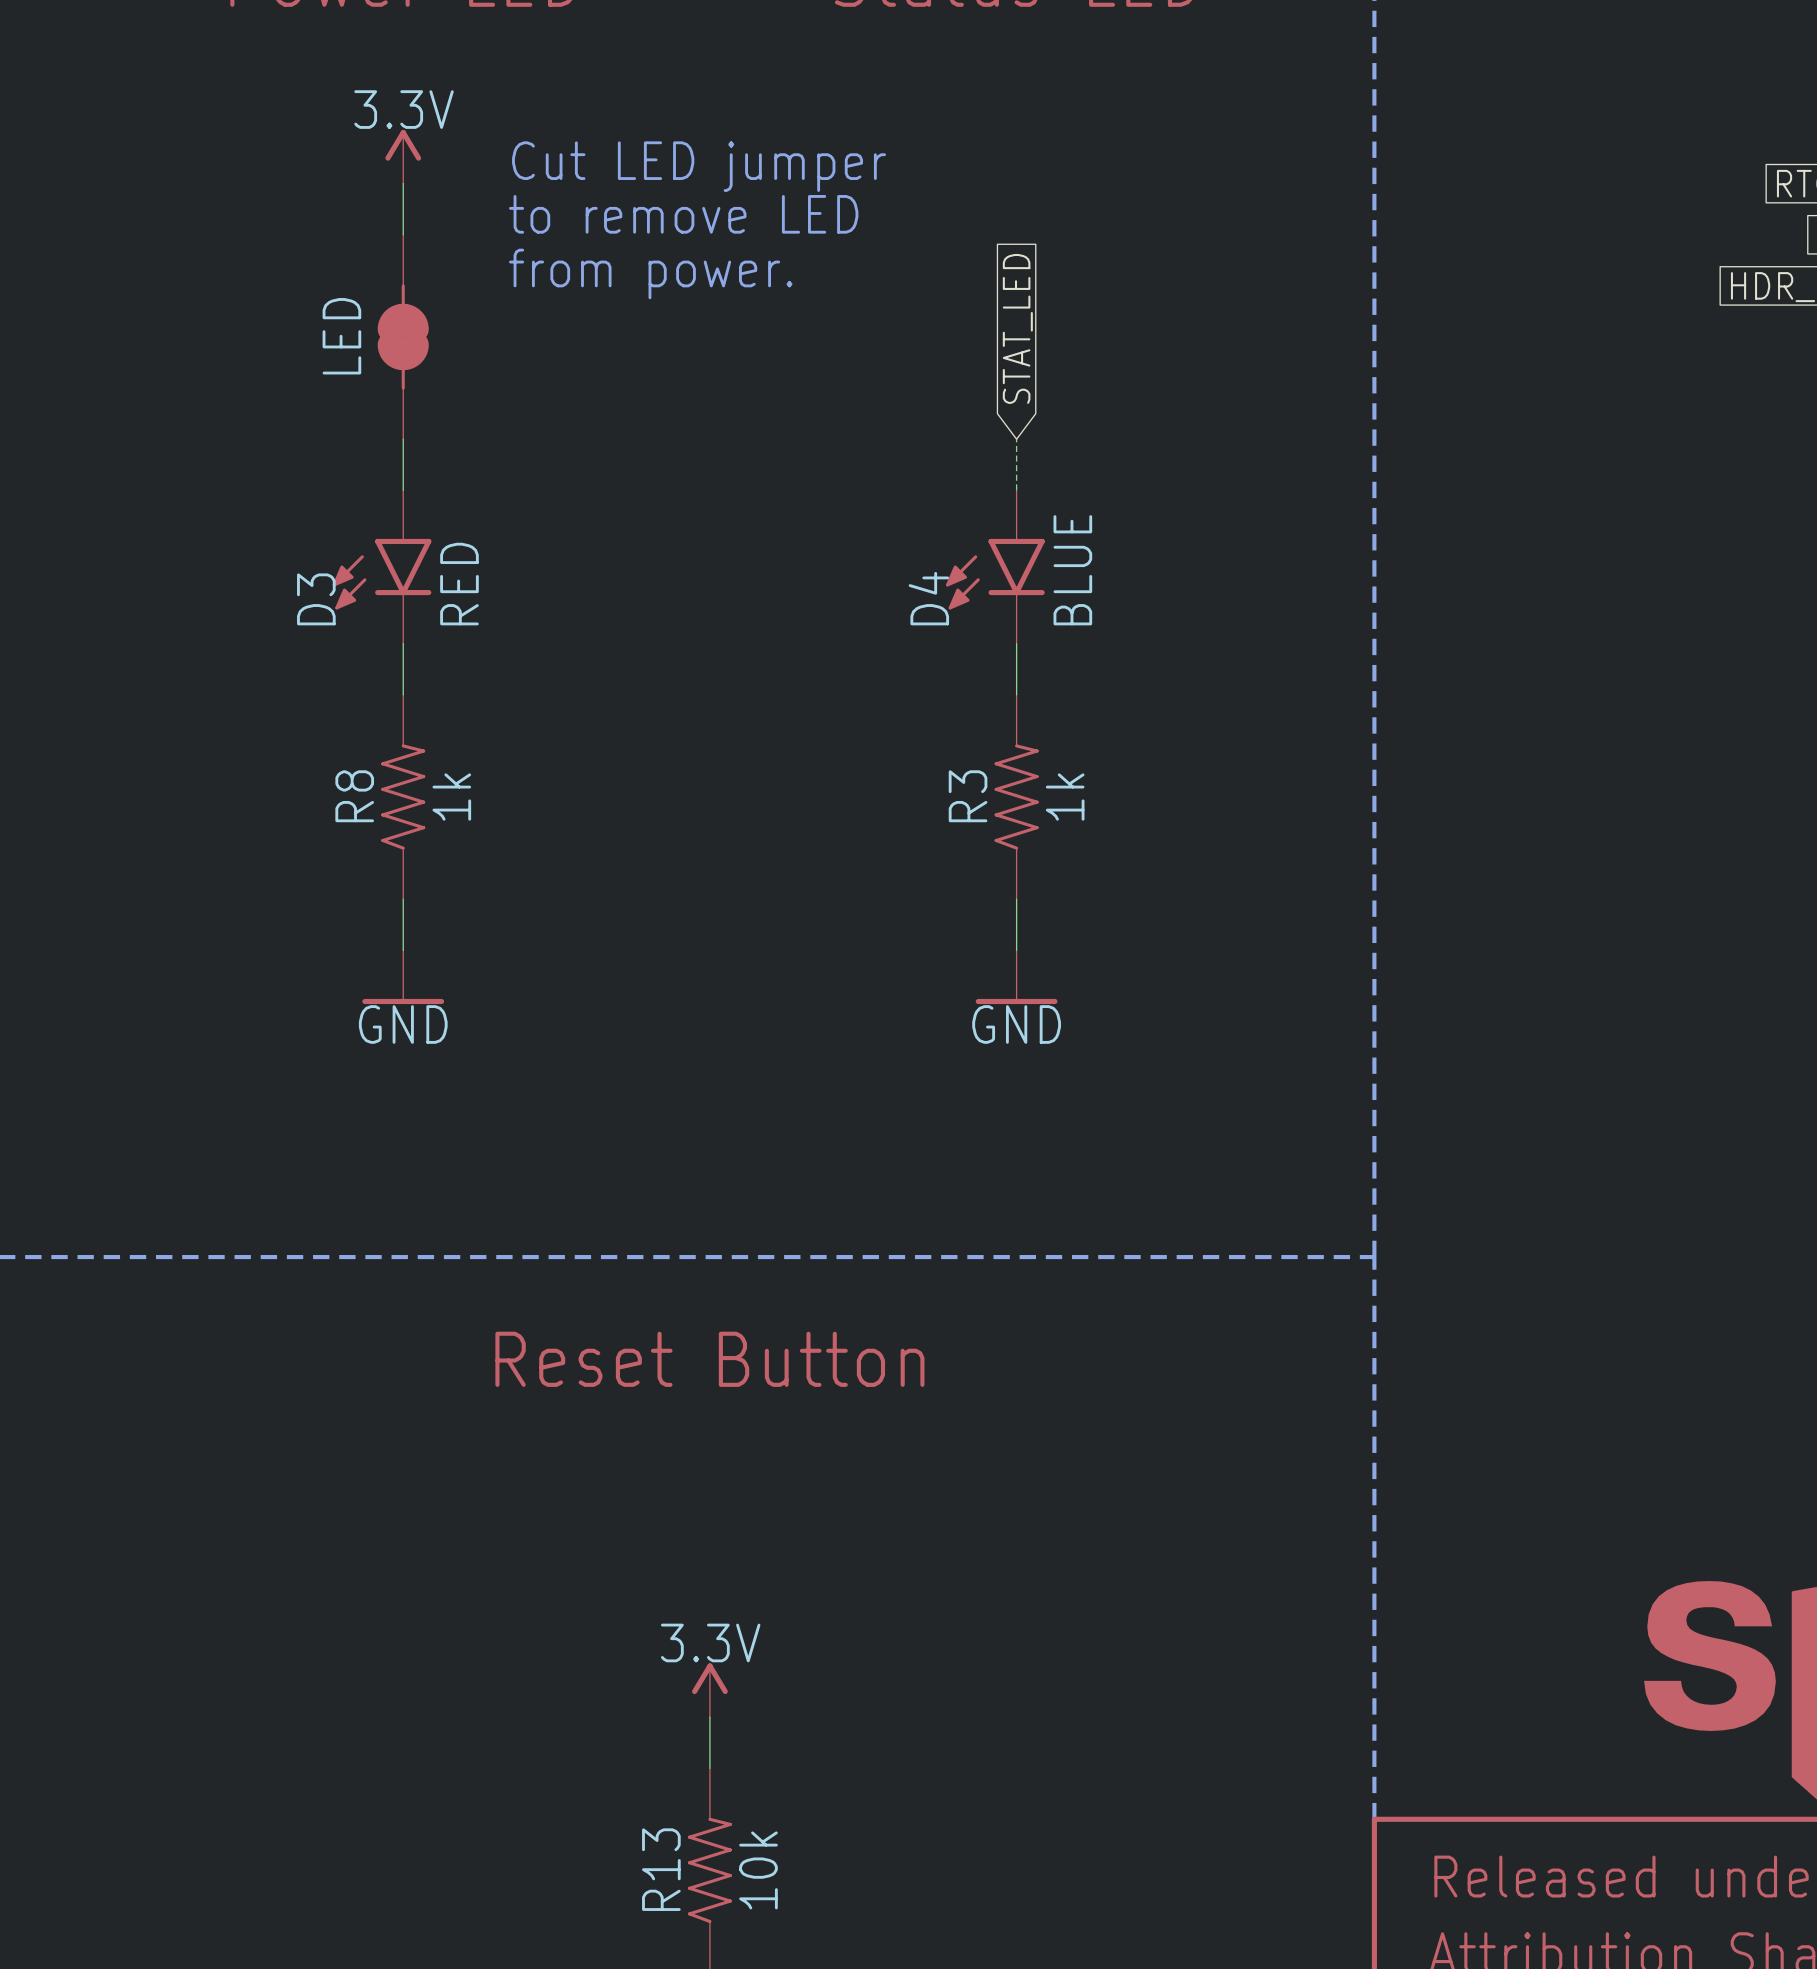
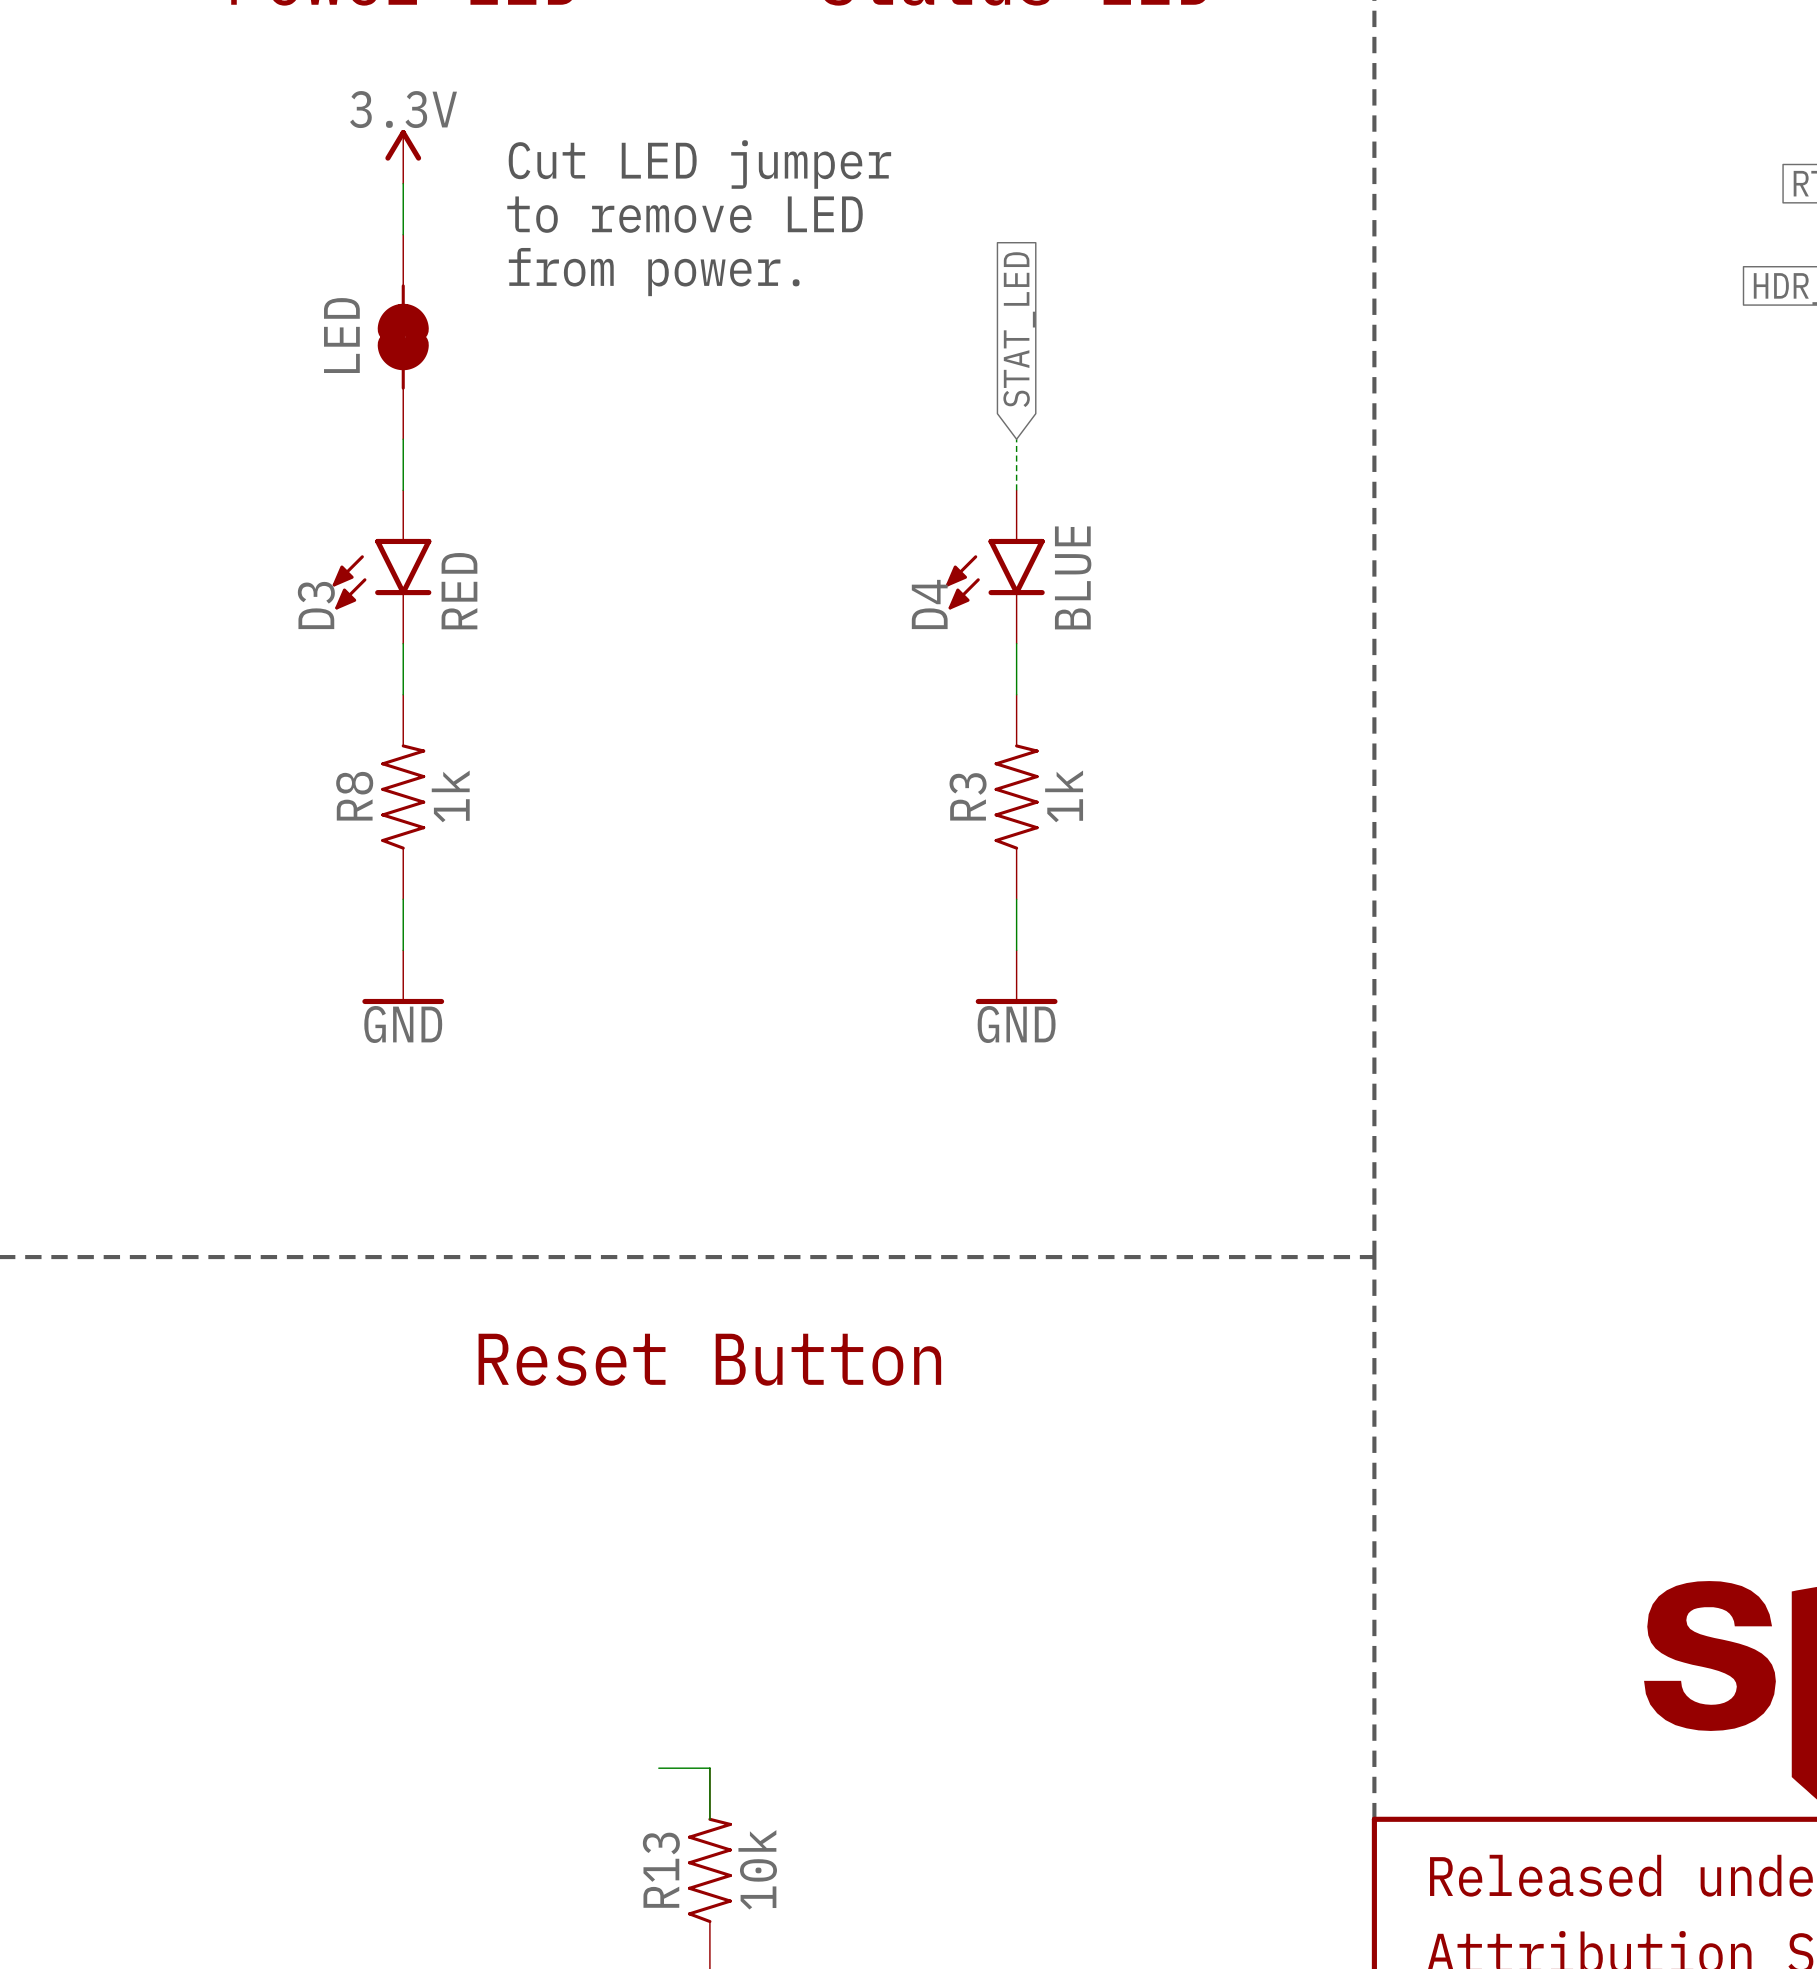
power symbol: 3.3V (709, 1690) -> none
wire: (709, 1717) (709, 1768) -> none
wire: none -> (658, 1768) (709, 1768) (709, 1819)

